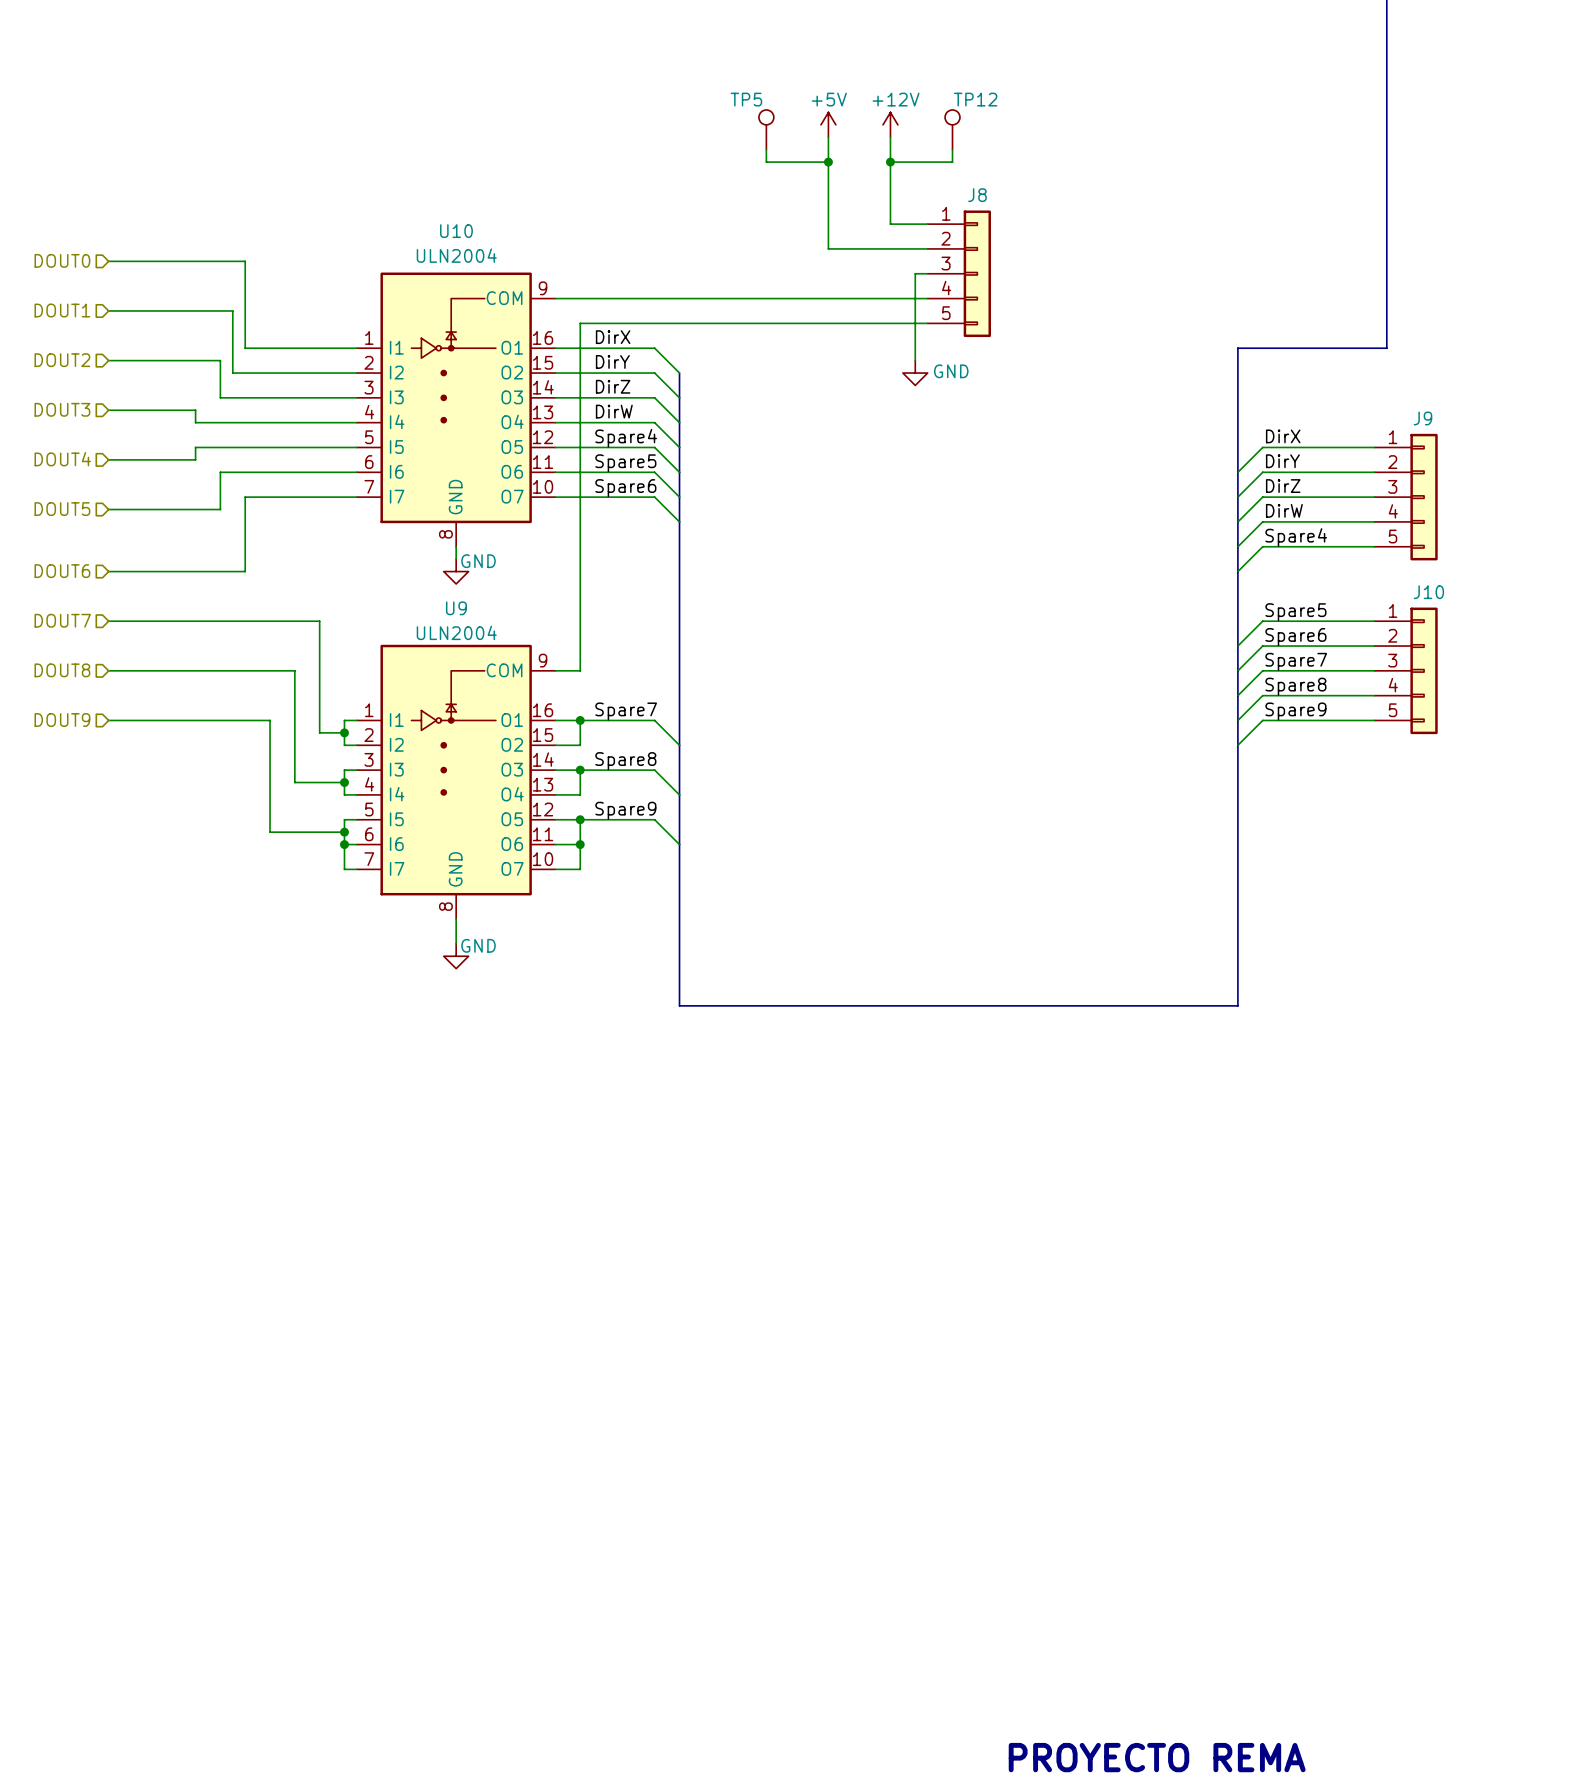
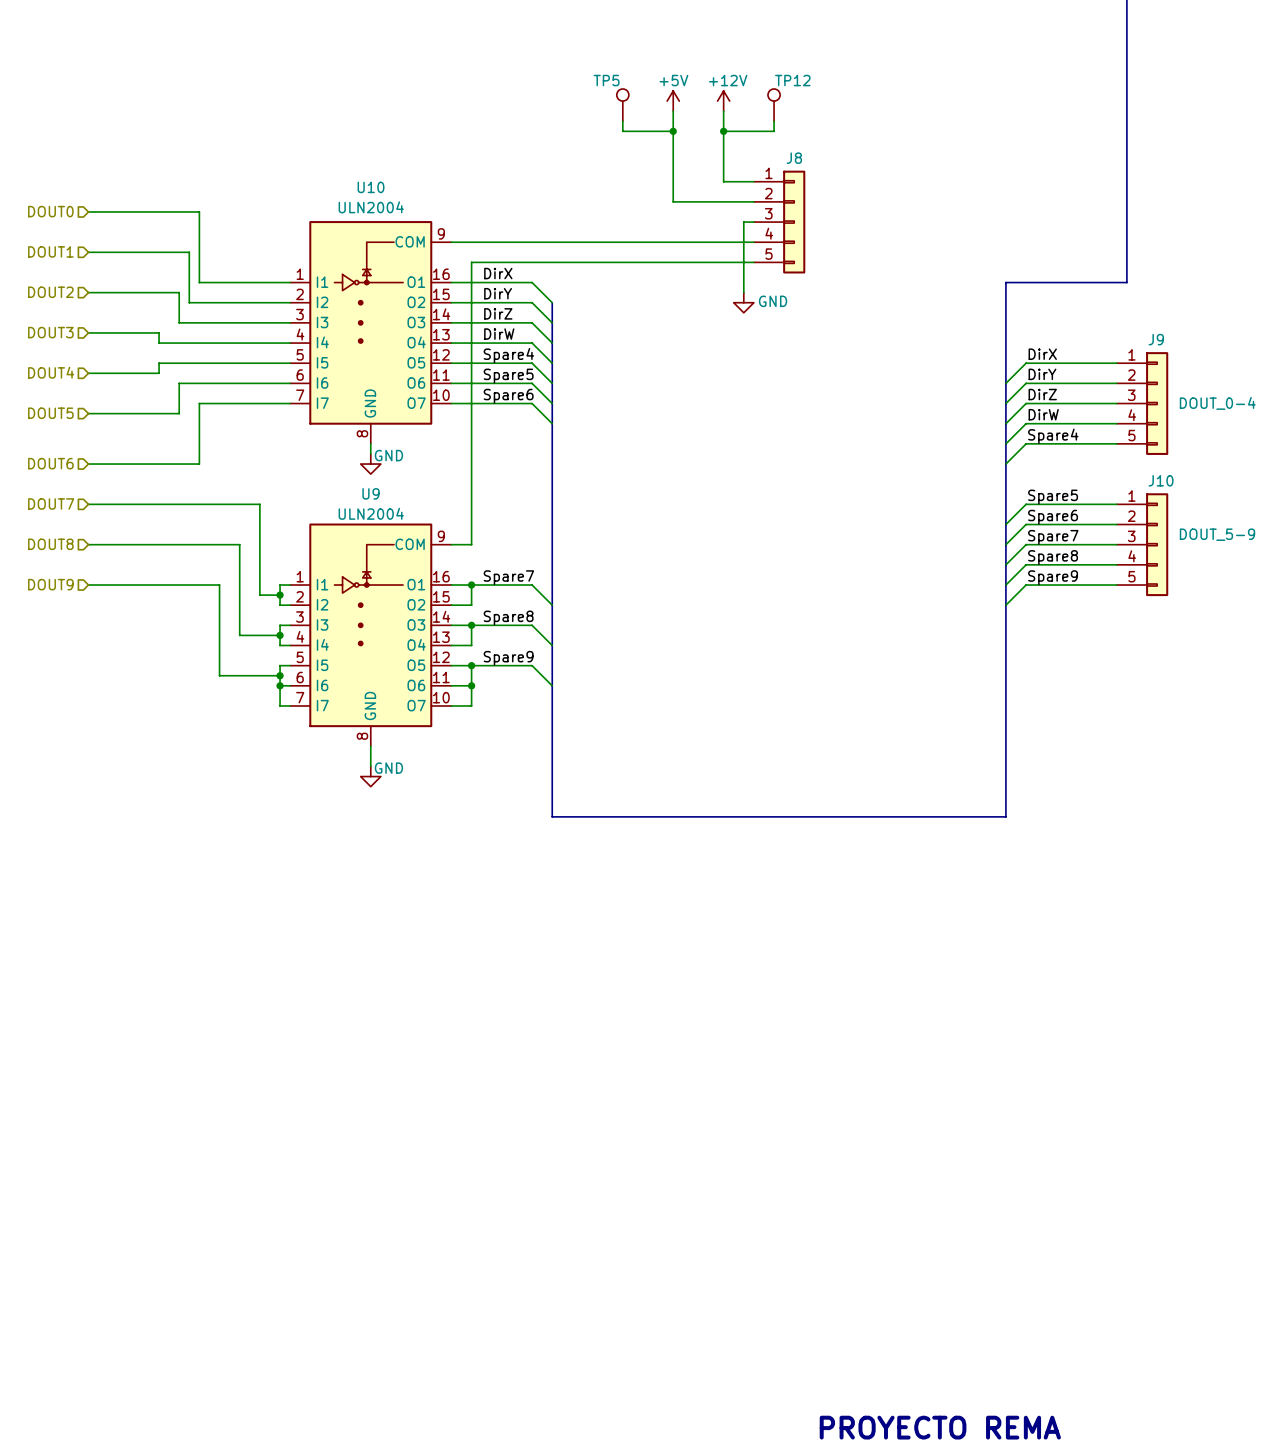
J9 value: none -> DOUT_0-4 (1217, 403)
J10 value: none -> DOUT_5-9 (1217, 534)

